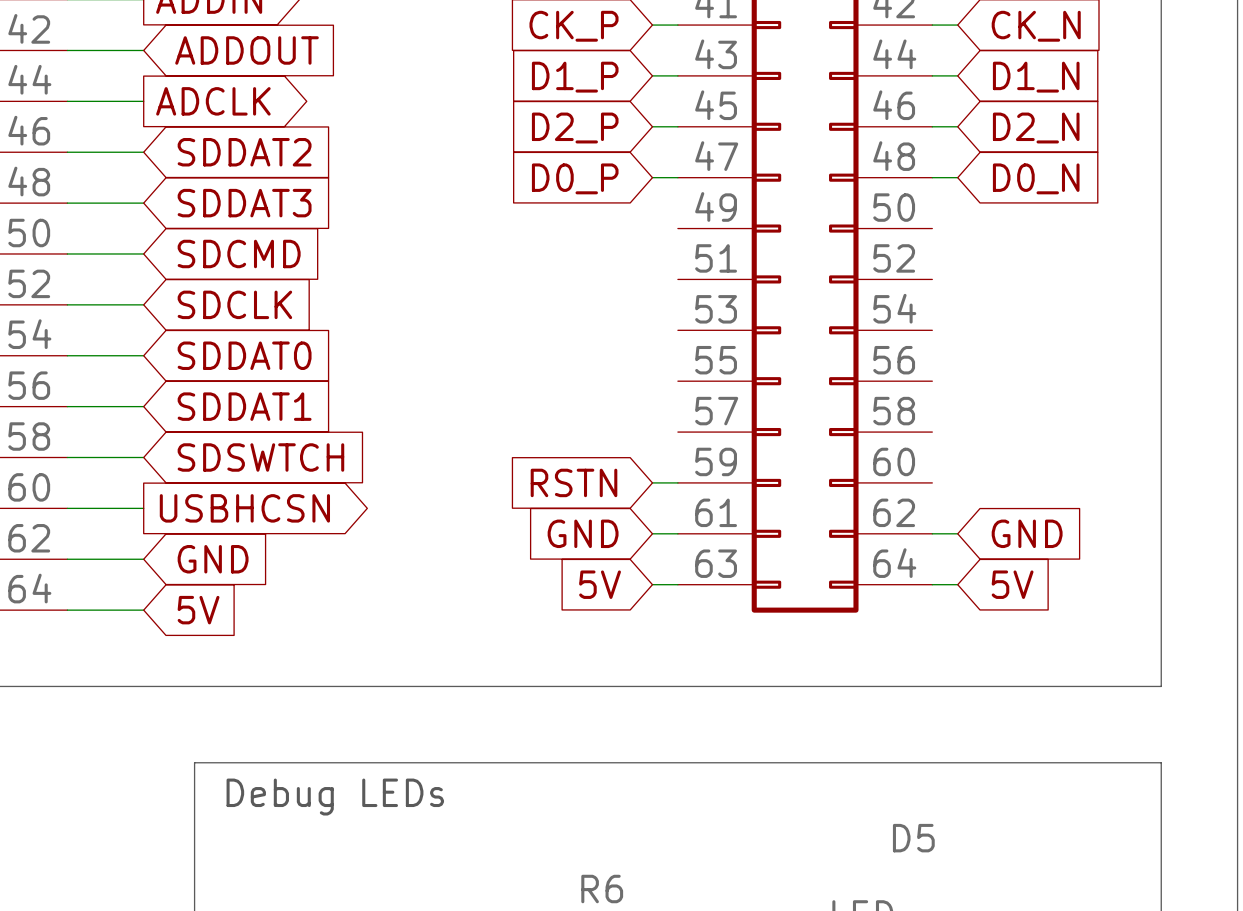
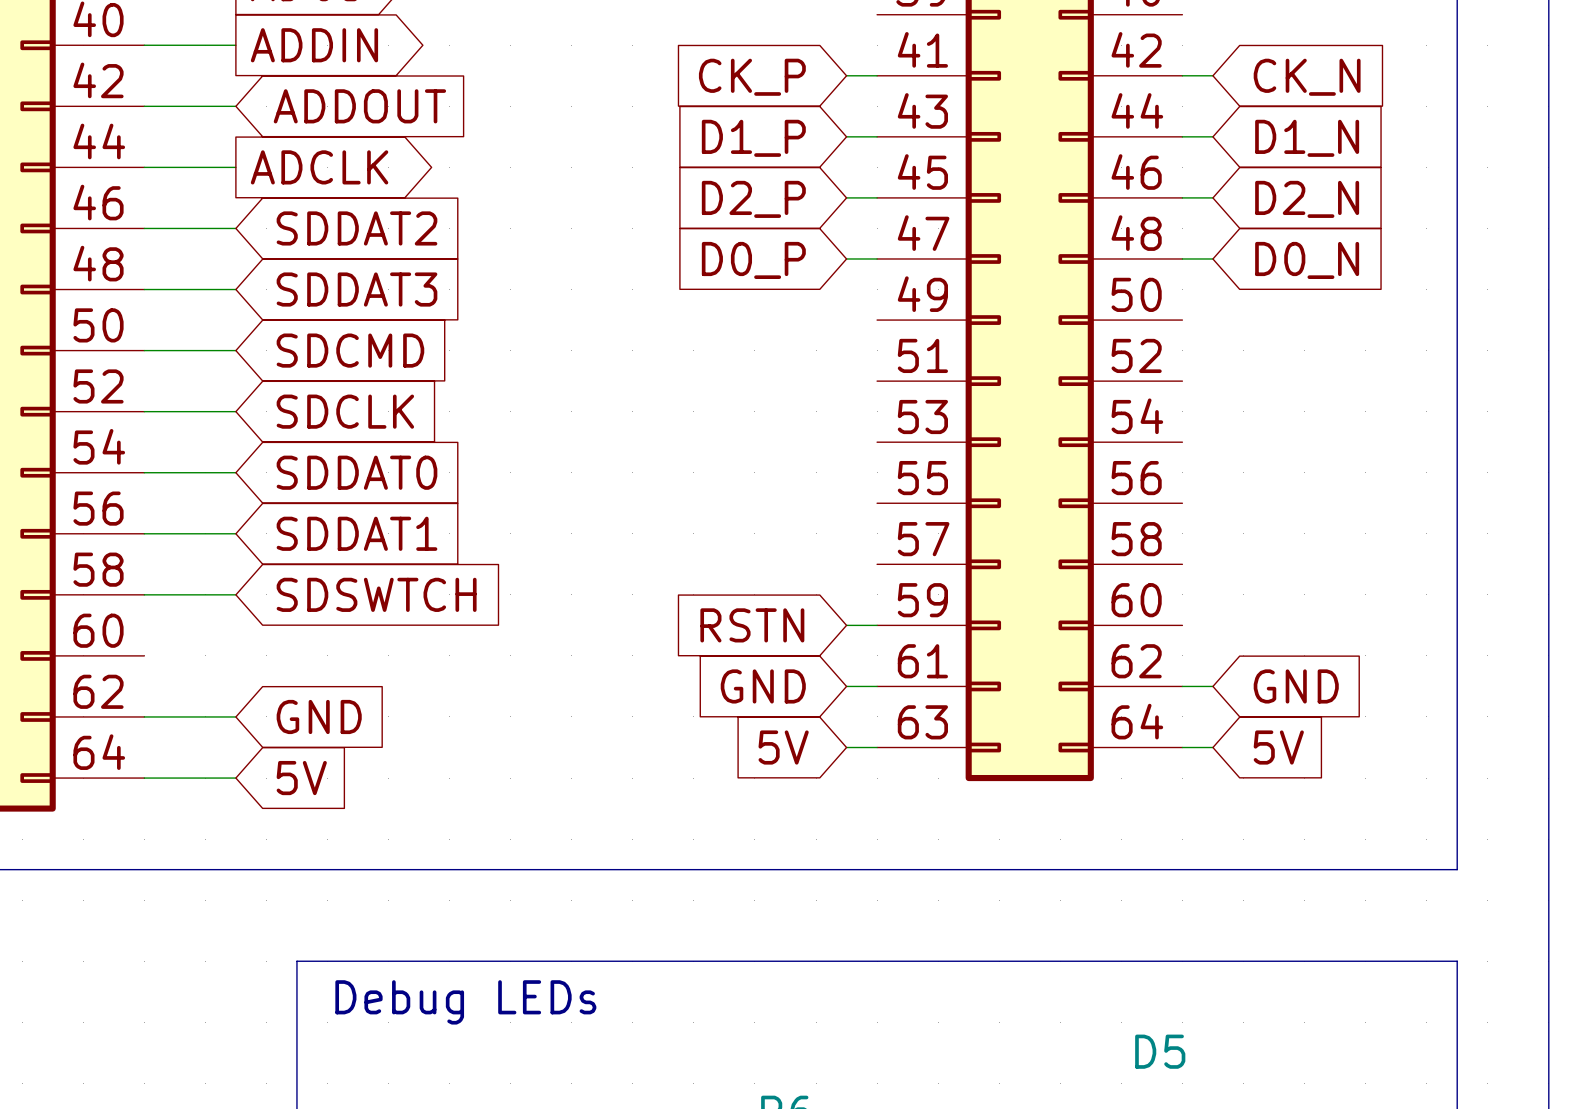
wire: (67, 508) (143, 508) -> none
global label: USBHCSN (244, 508) -> none

